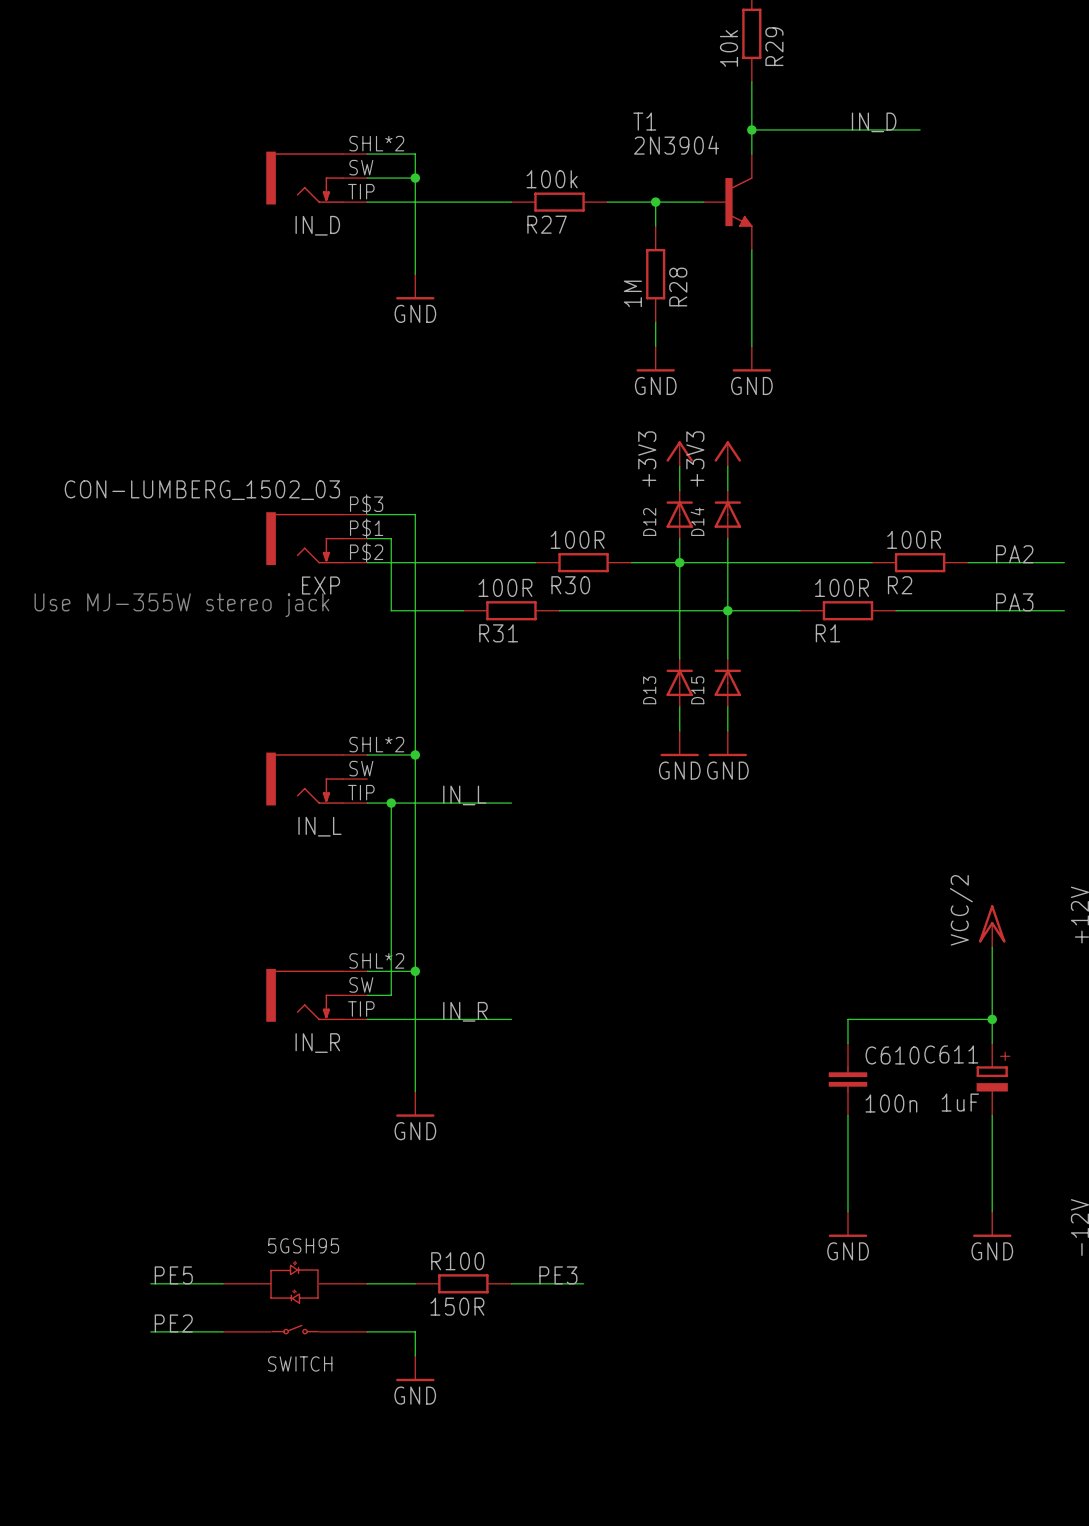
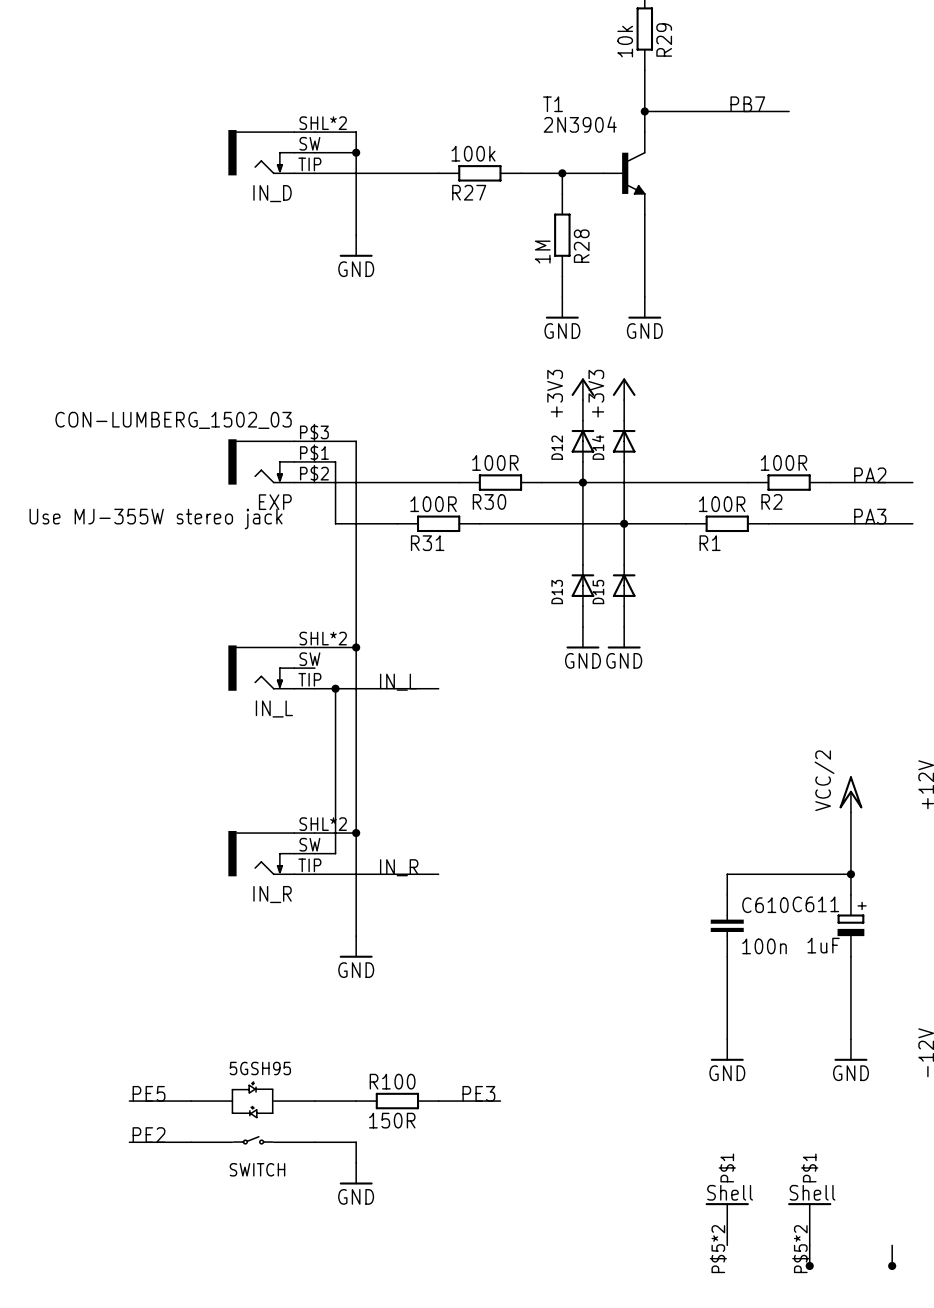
label: IN_D (874, 122) -> PB7 (747, 104)
part: none -> (727, 1224)
part: none -> (809, 1224)
wire: none -> (809, 1245) (809, 1265)
wire: none -> (892, 1245) (892, 1265)
junction: none -> (809, 1265)
junction: none -> (892, 1265)

